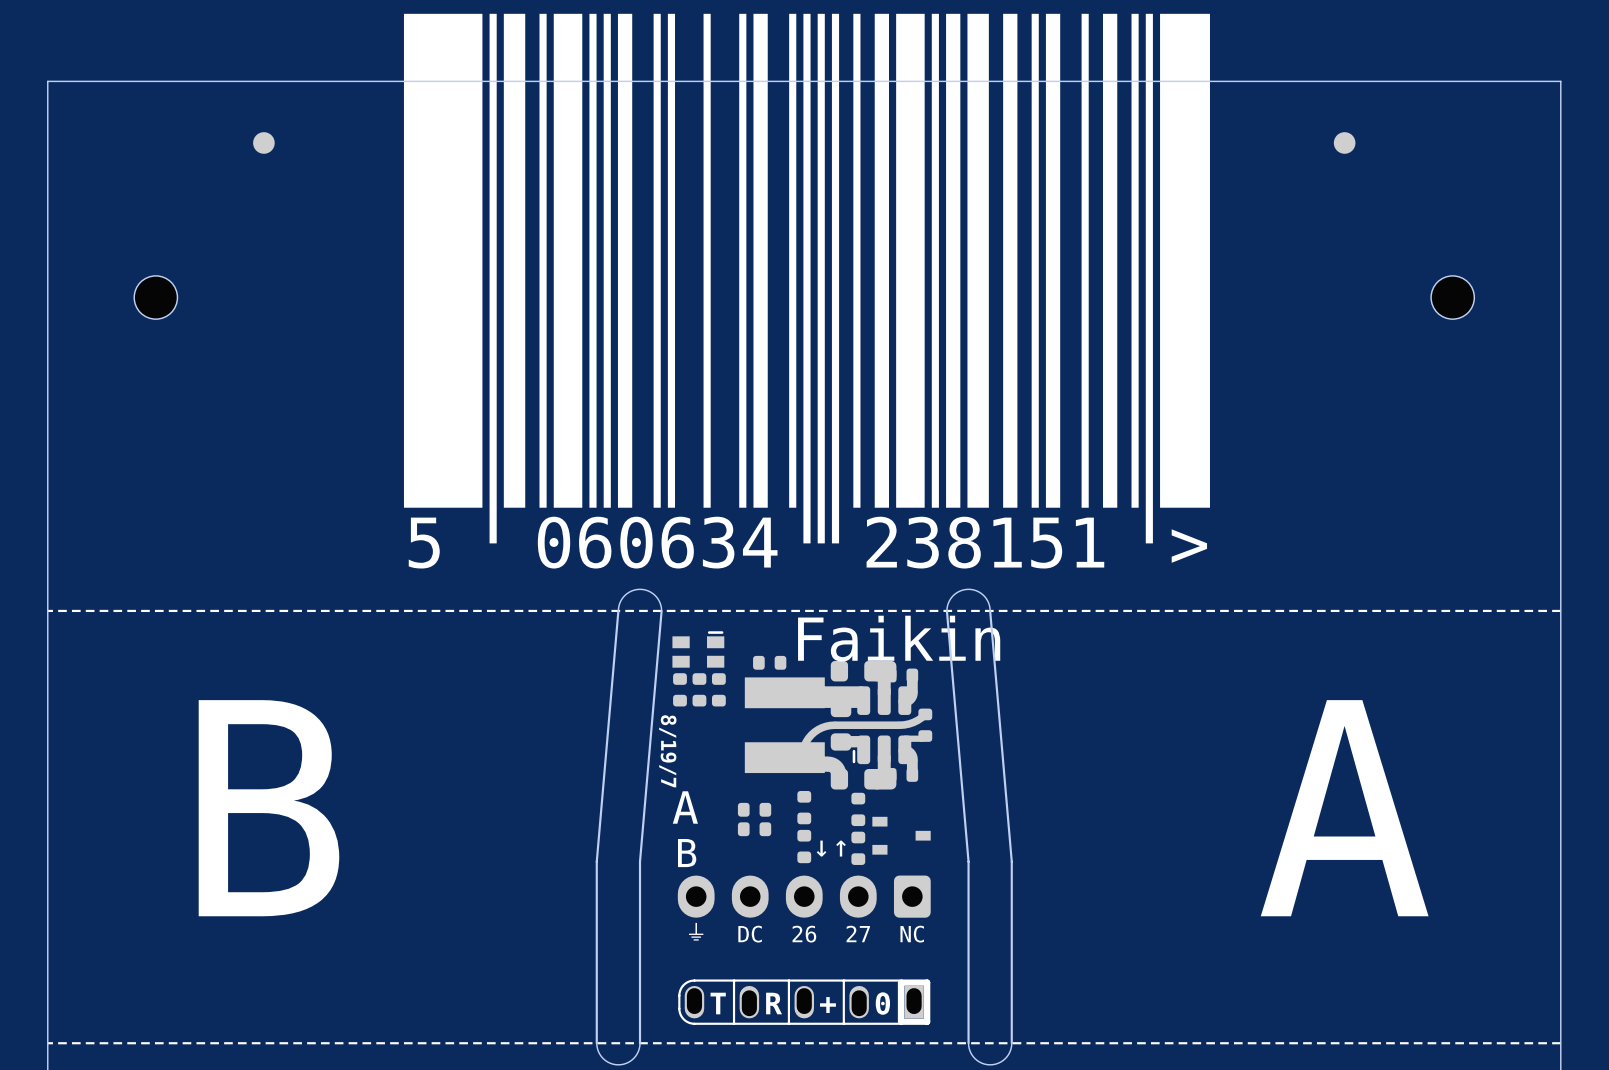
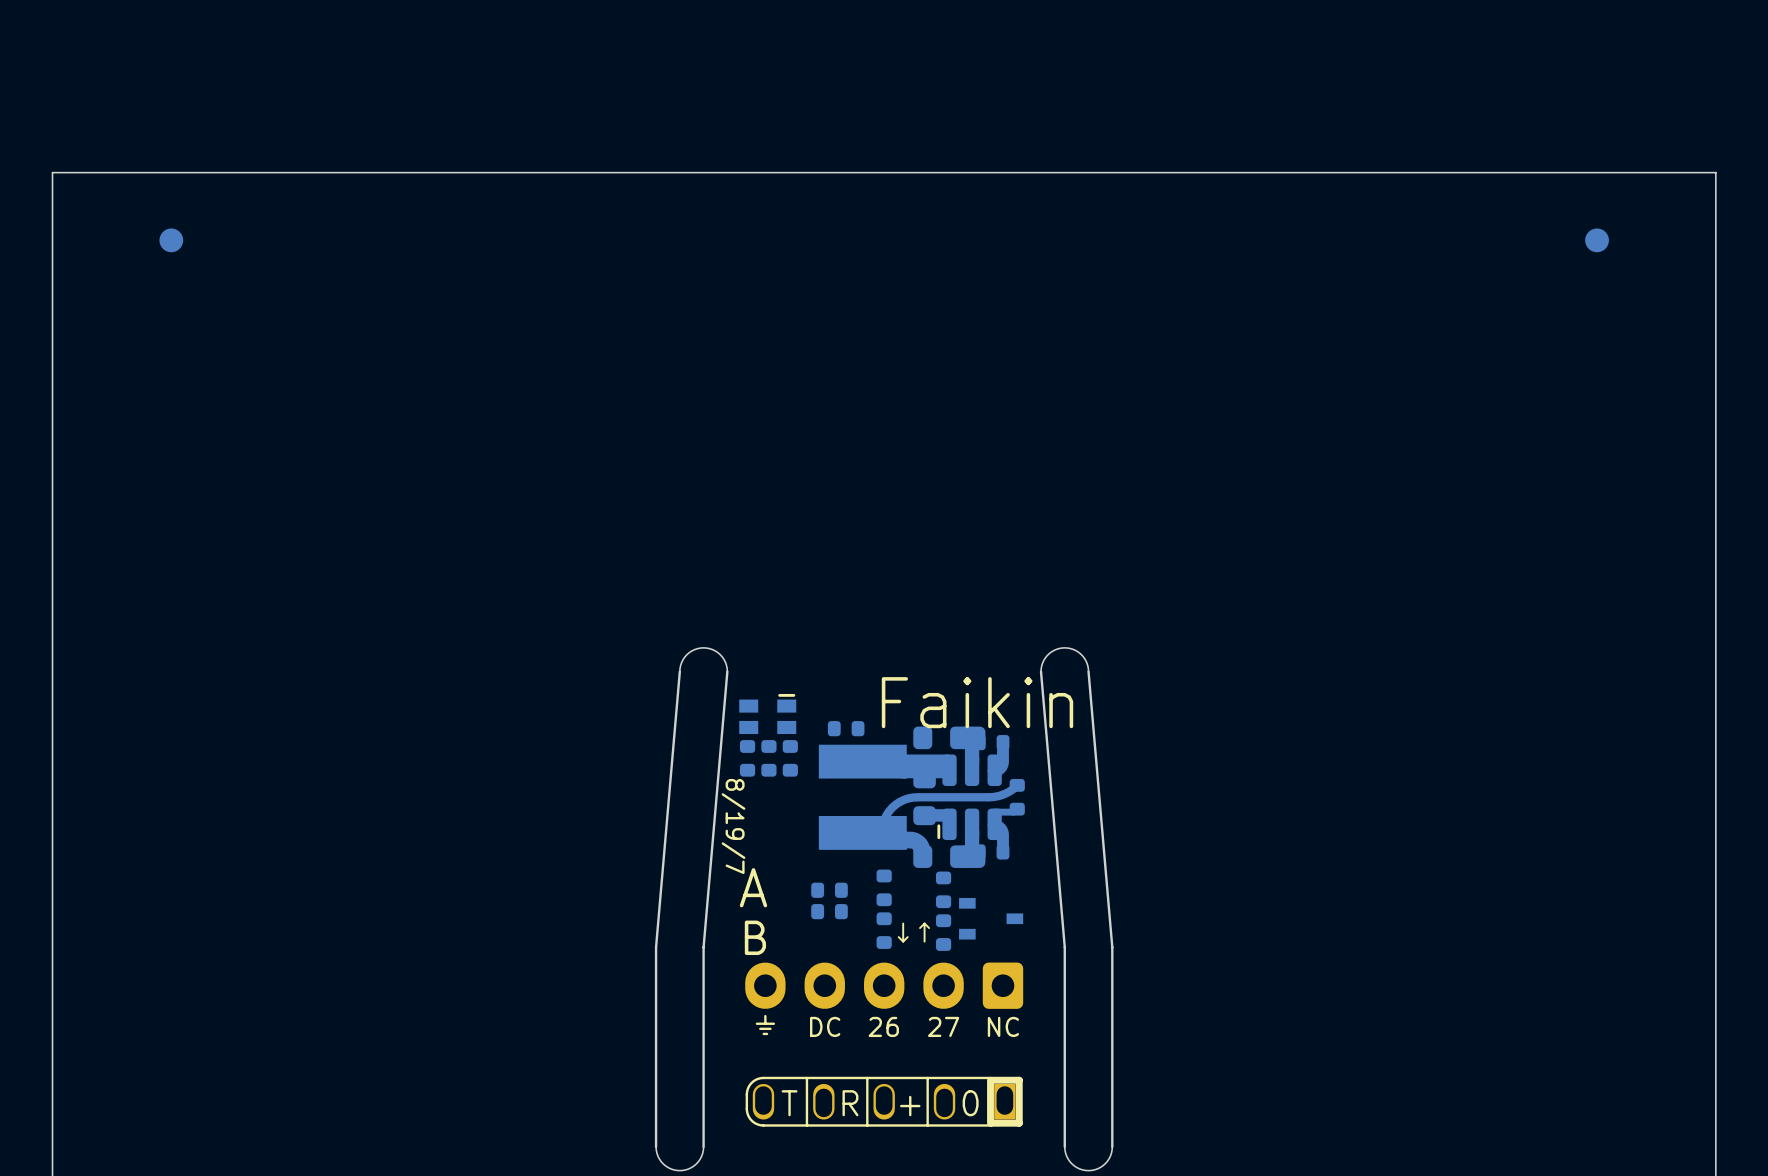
drawing: [403, 13, 1210, 544] -> none
part position: (263, 142) -> (171, 240)
part position: (1344, 142) -> (1597, 240)
board edge: (1560, 157) (1560, 81) (47, 81) (47, 157) -> (1715, 172) (52, 172)
part: (155, 297) -> none
part: (1452, 297) -> none
line: (1560, 610) (47, 610) -> none
text: B (268, 808) -> none
text: A (1344, 808) -> none
line: (1560, 1043) (47, 1043) -> none

